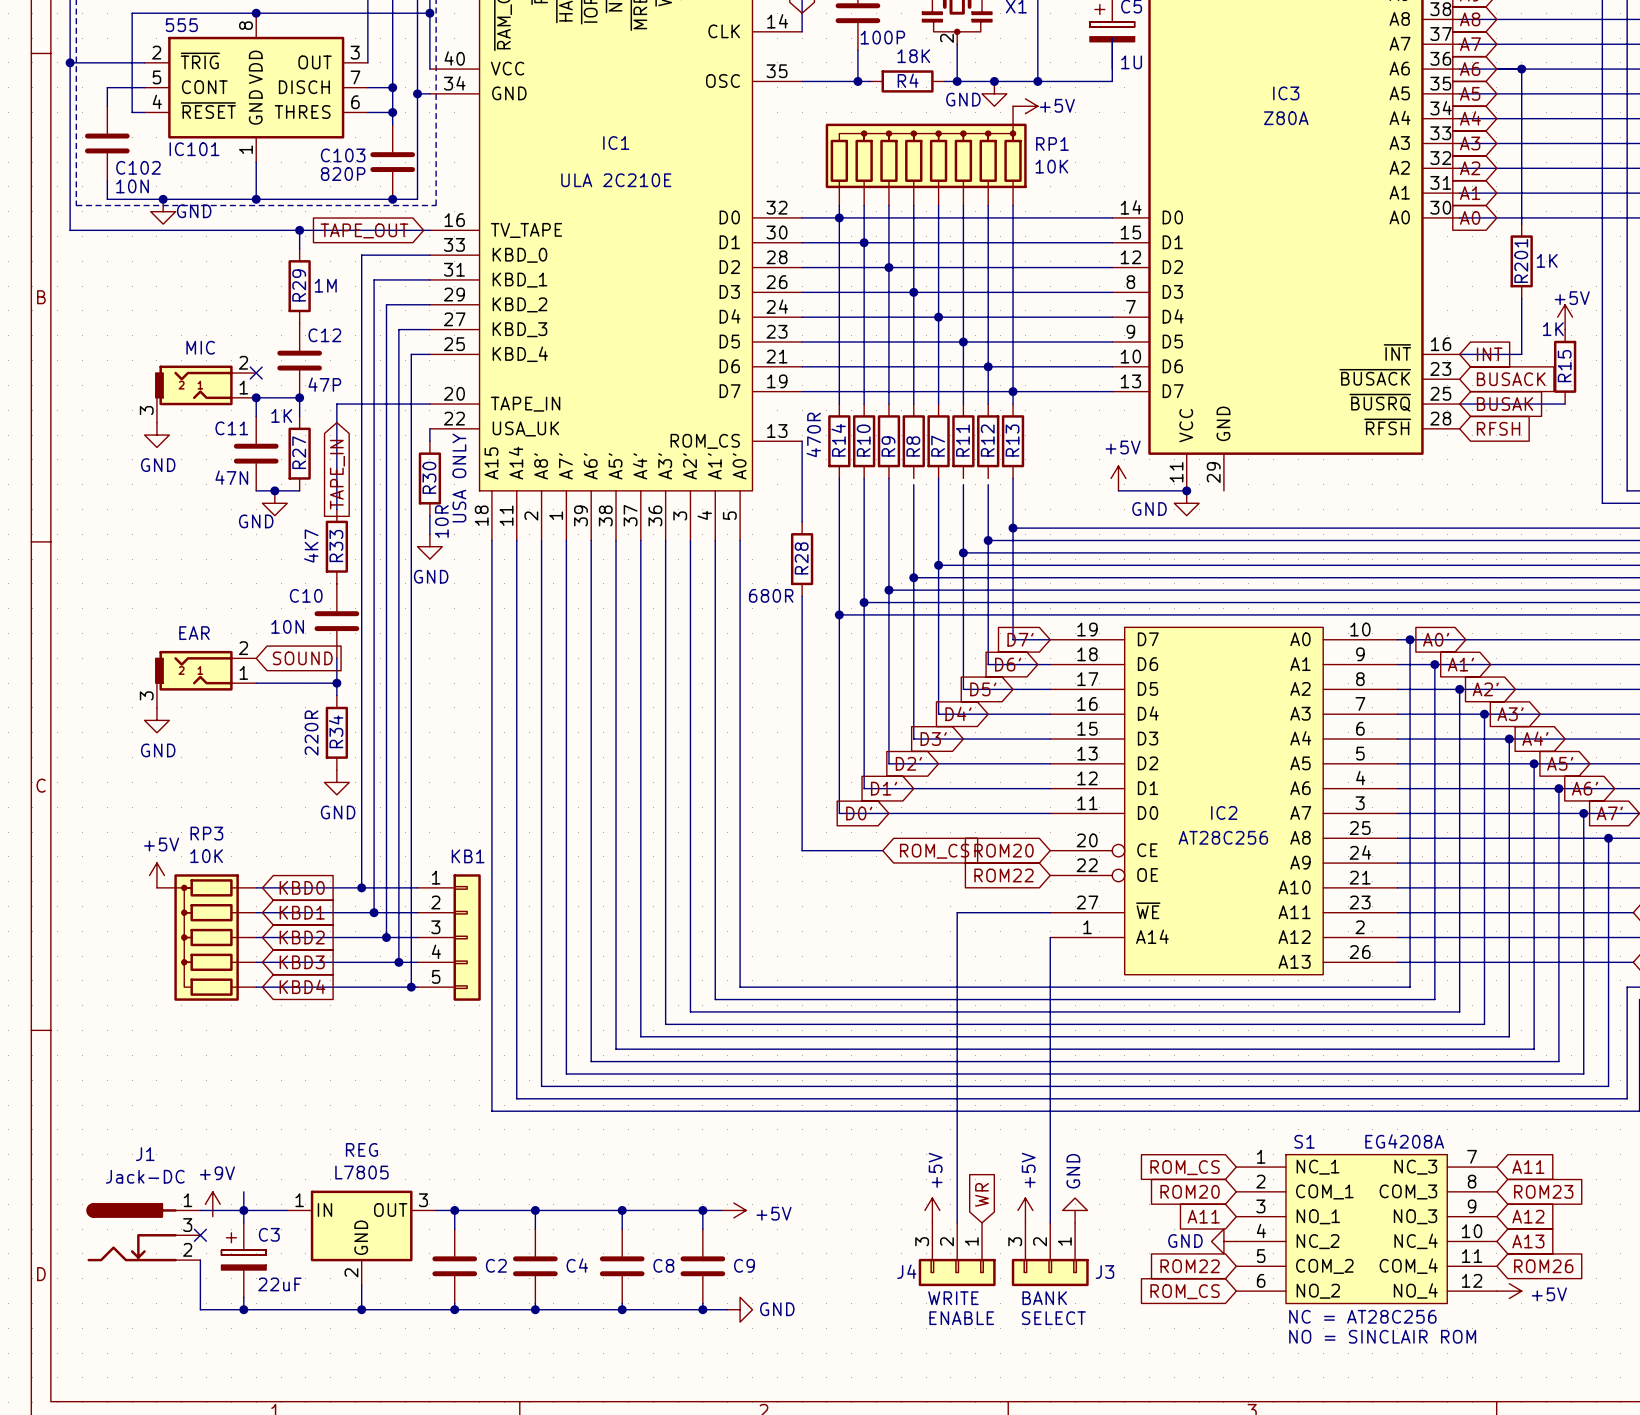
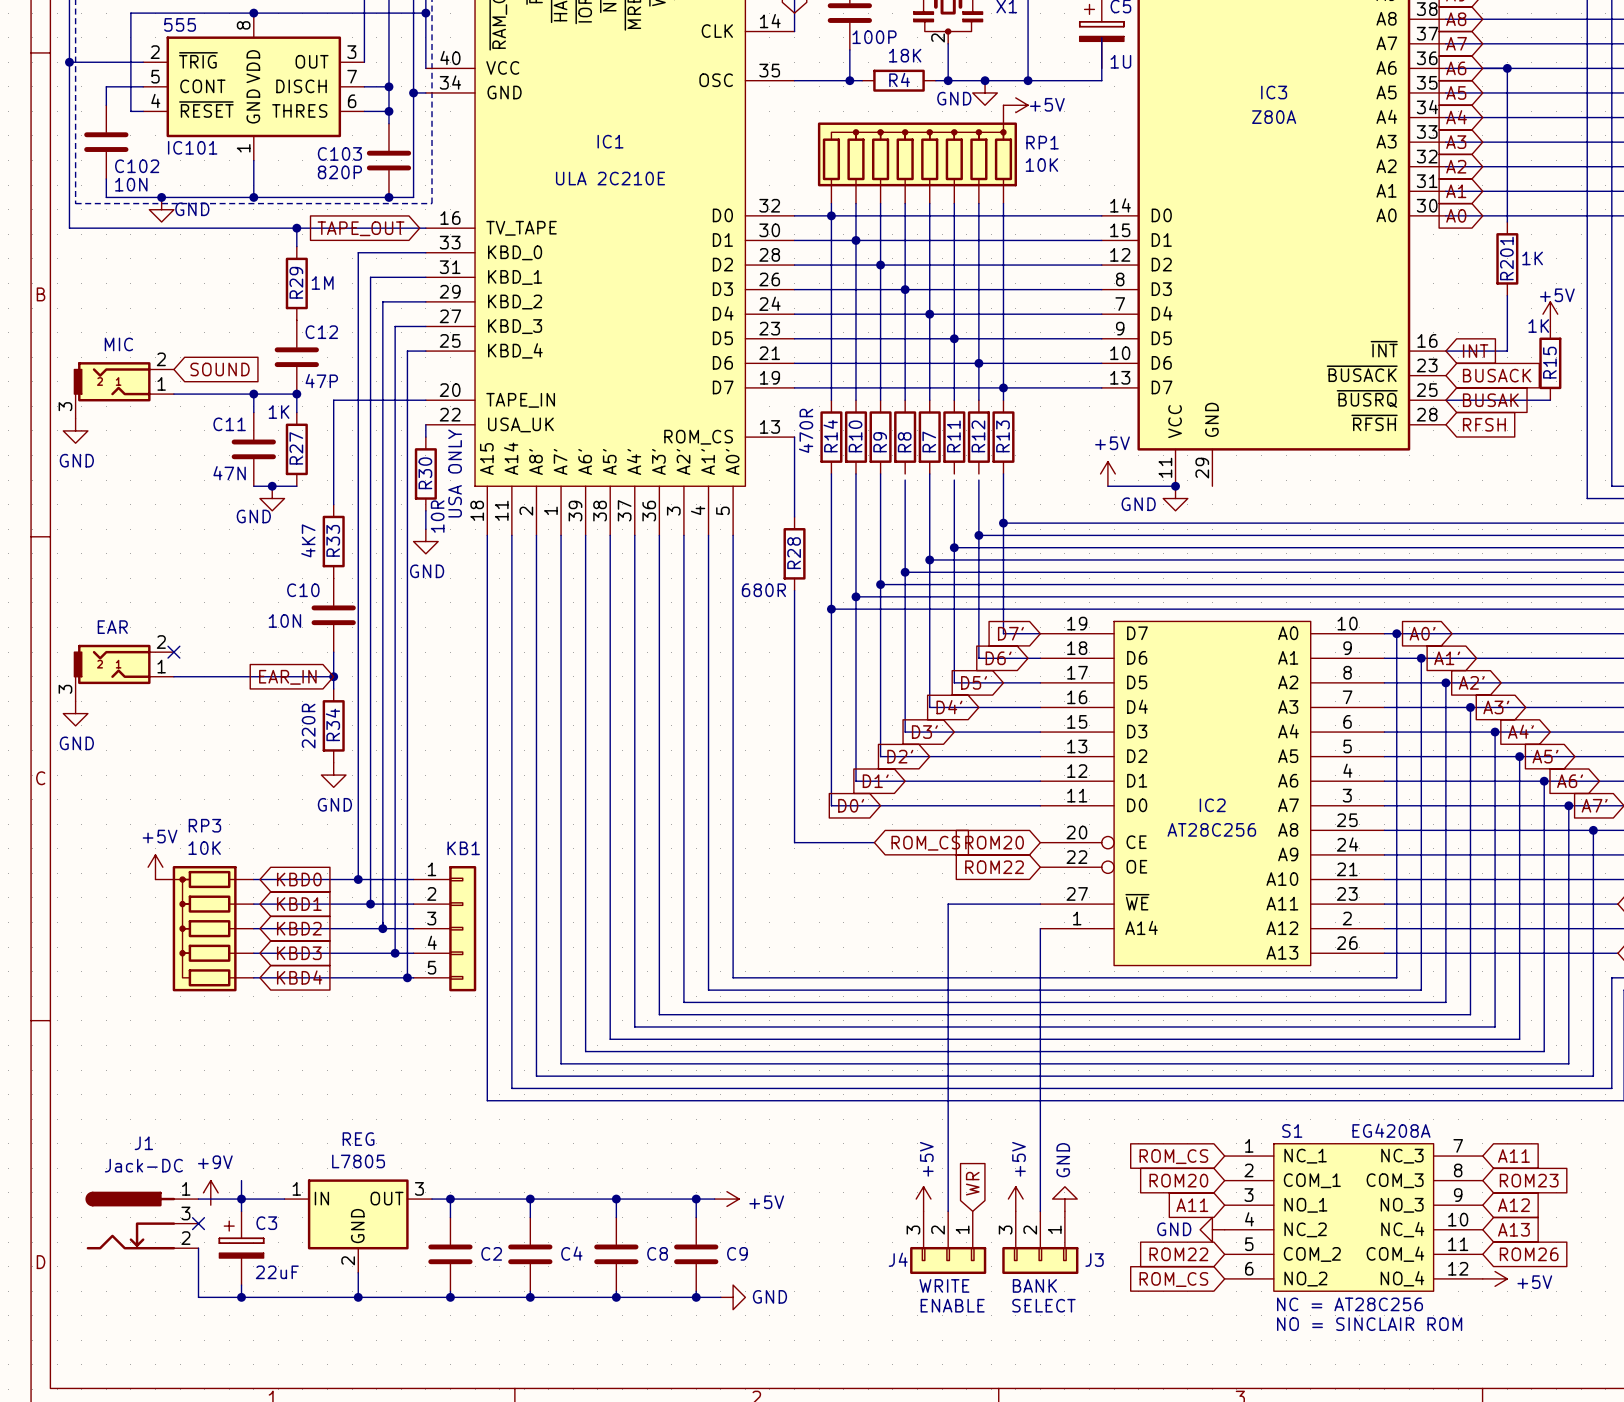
global label: none -> SOUND (220, 369)
no-connect mark: (256, 373) -> none
MIC position: (205, 394) -> (124, 390)
power symbol position: GND (156, 435) -> GND (75, 430)
global label: TAPE_IN (337, 474) -> none
no-connect mark: none -> (173, 652)
global label: SOUND (302, 658) -> none
EAR position: (205, 679) -> (124, 673)
global label: none -> EAR_IN (287, 677)
power symbol position: GND (156, 720) -> GND (75, 713)

